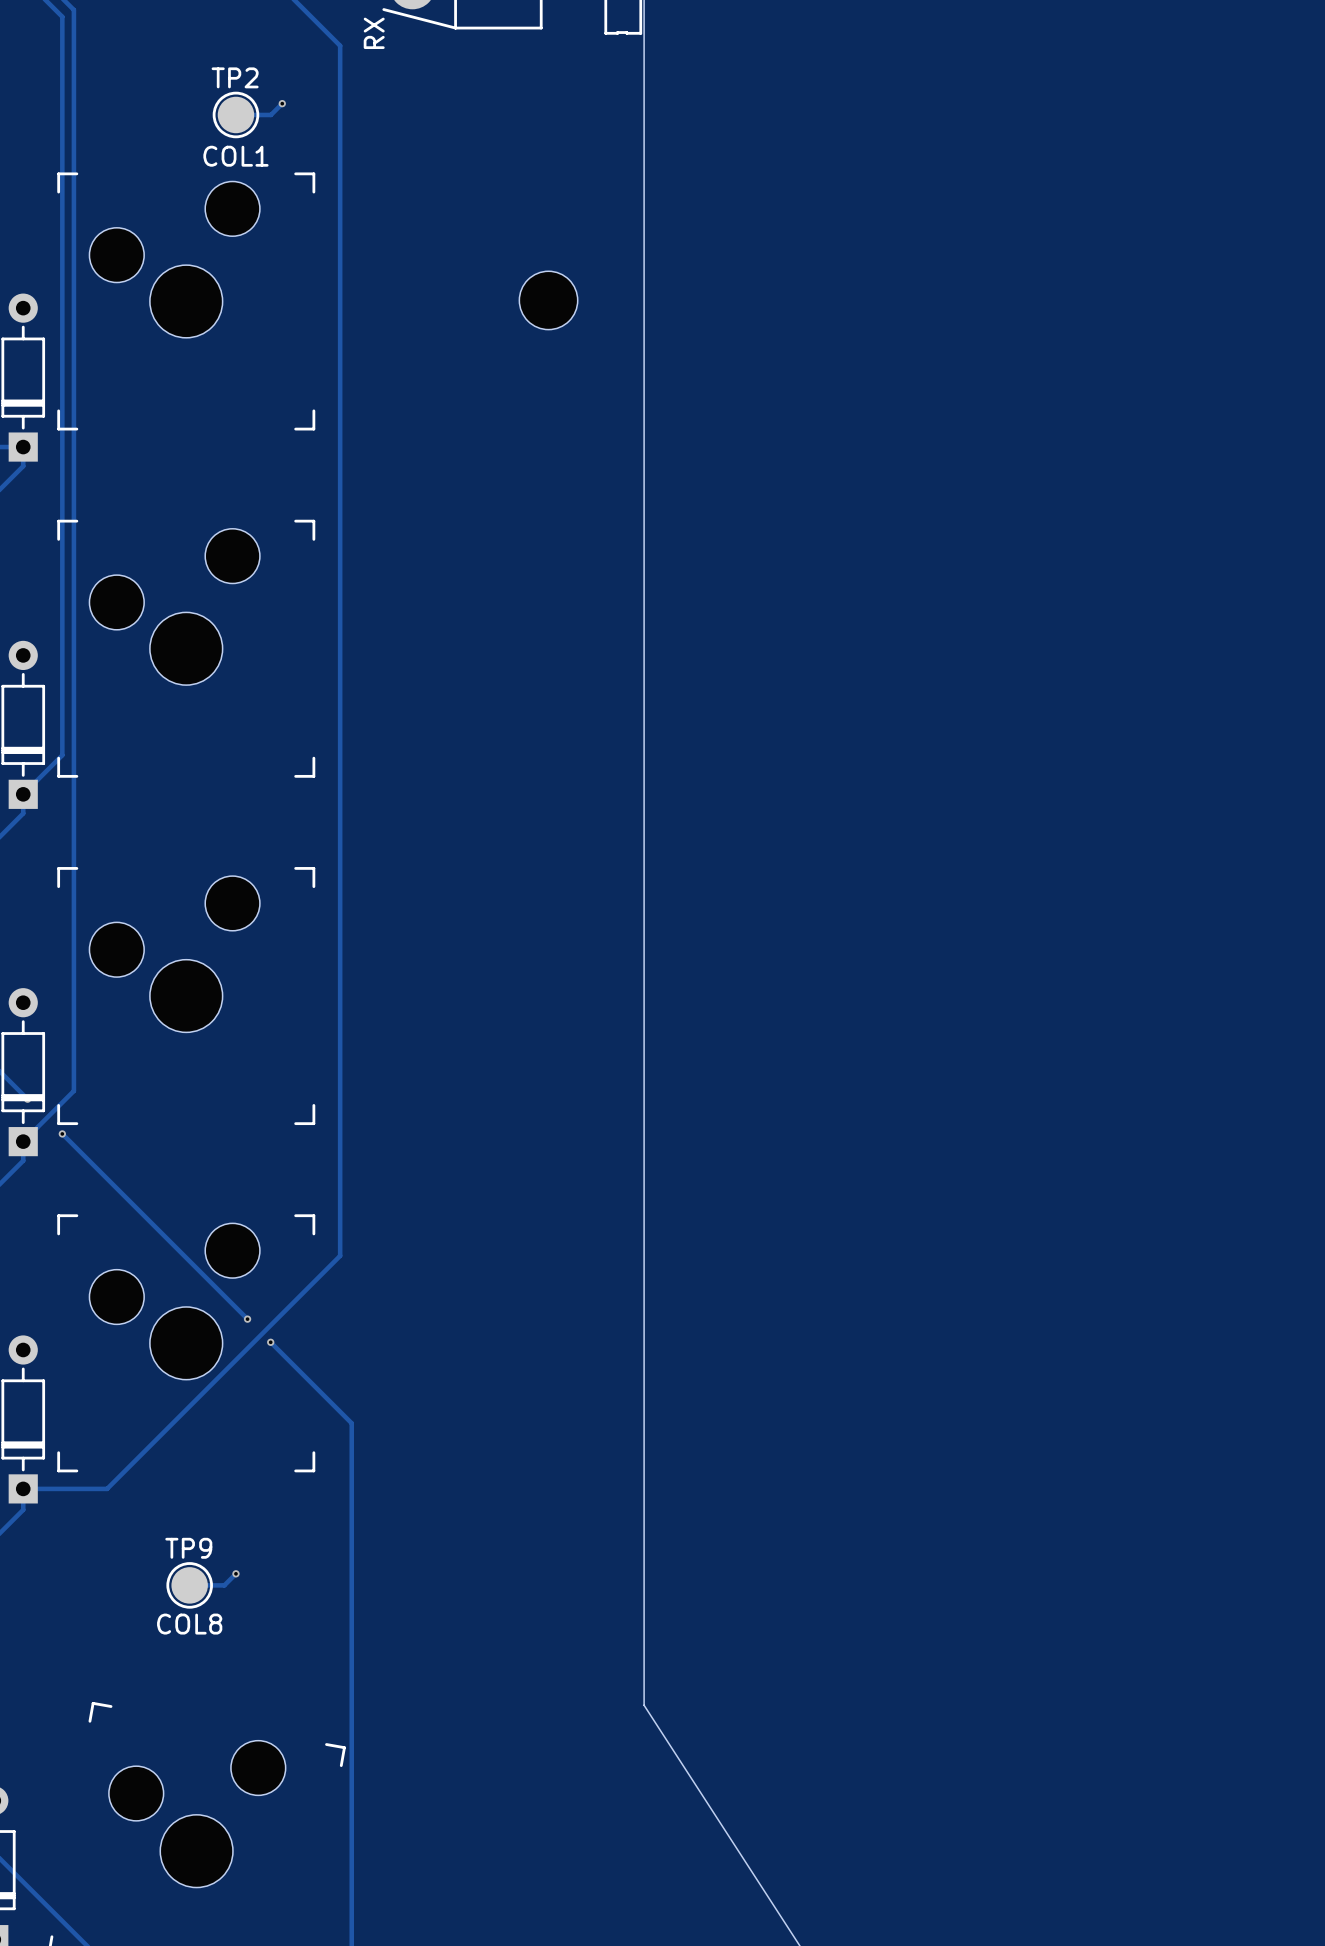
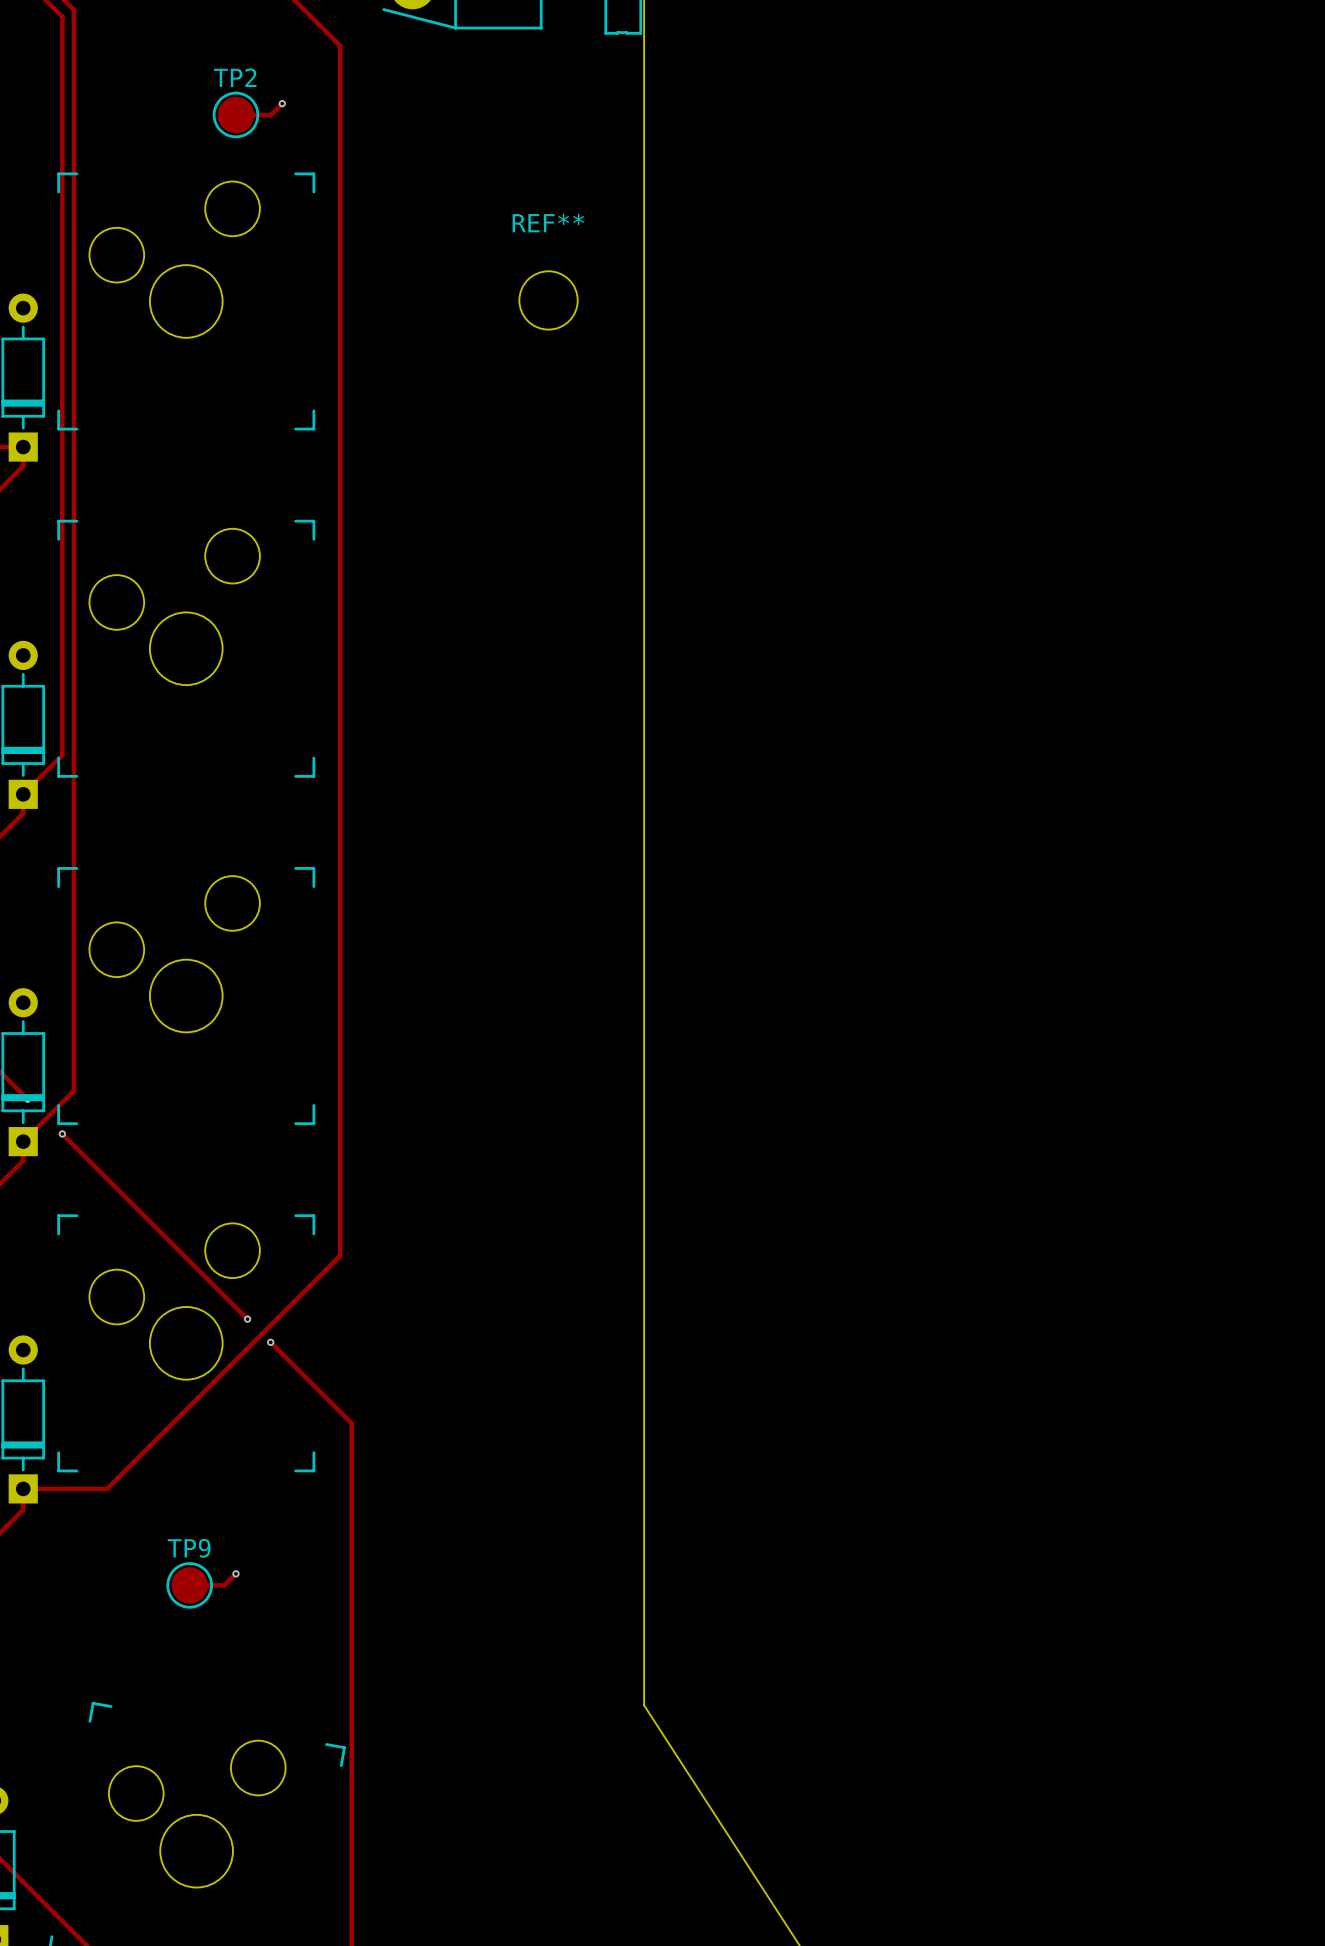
text: RX (374, 33) -> none
text: COL1 (235, 156) -> none
REF** name: none -> REF** (548, 223)
text: COL8 (189, 1624) -> none

